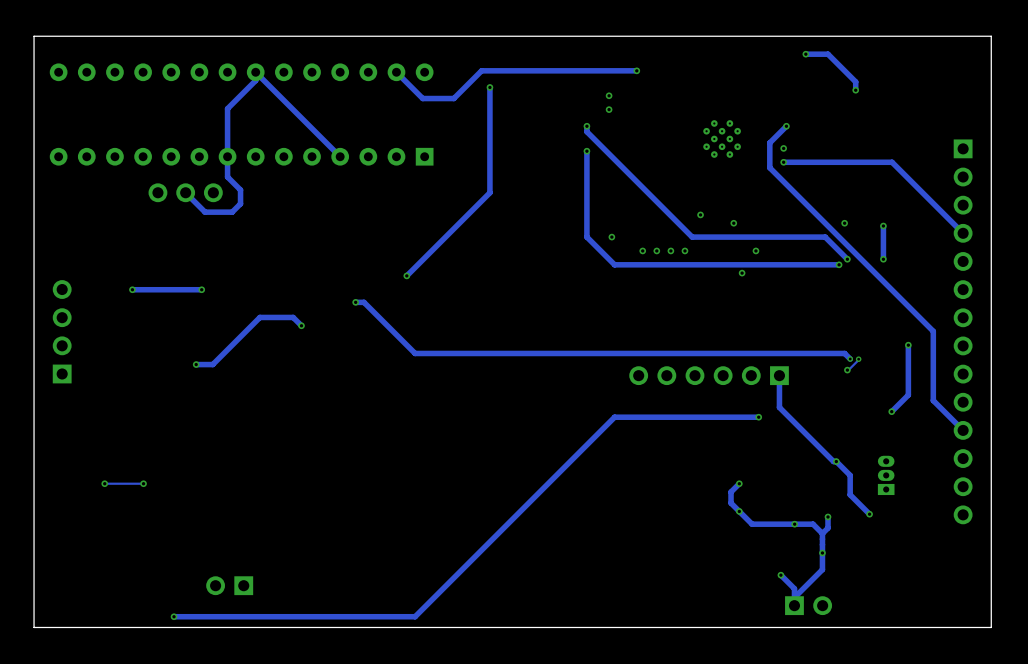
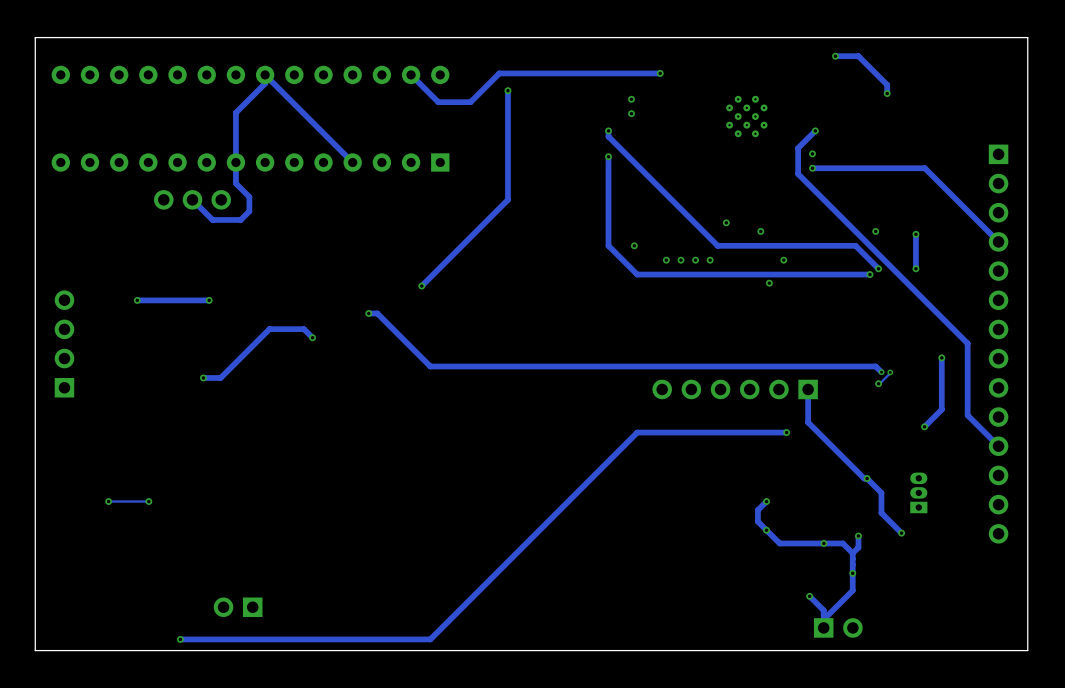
part: none -> (746, 116)
part: (722, 138) -> none

